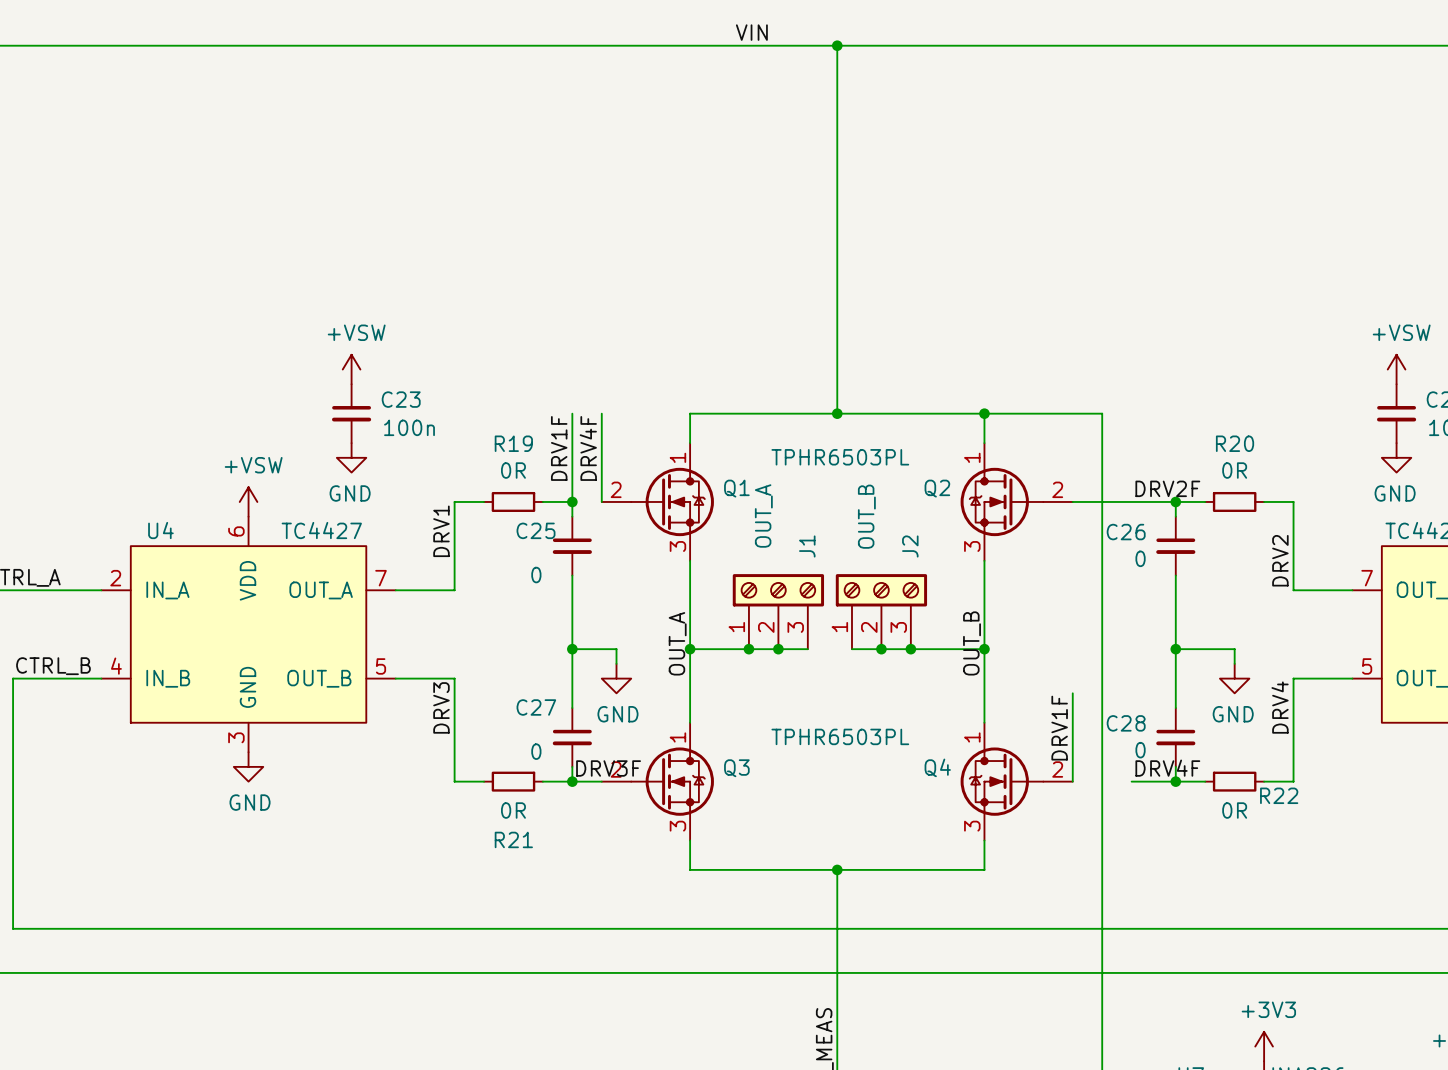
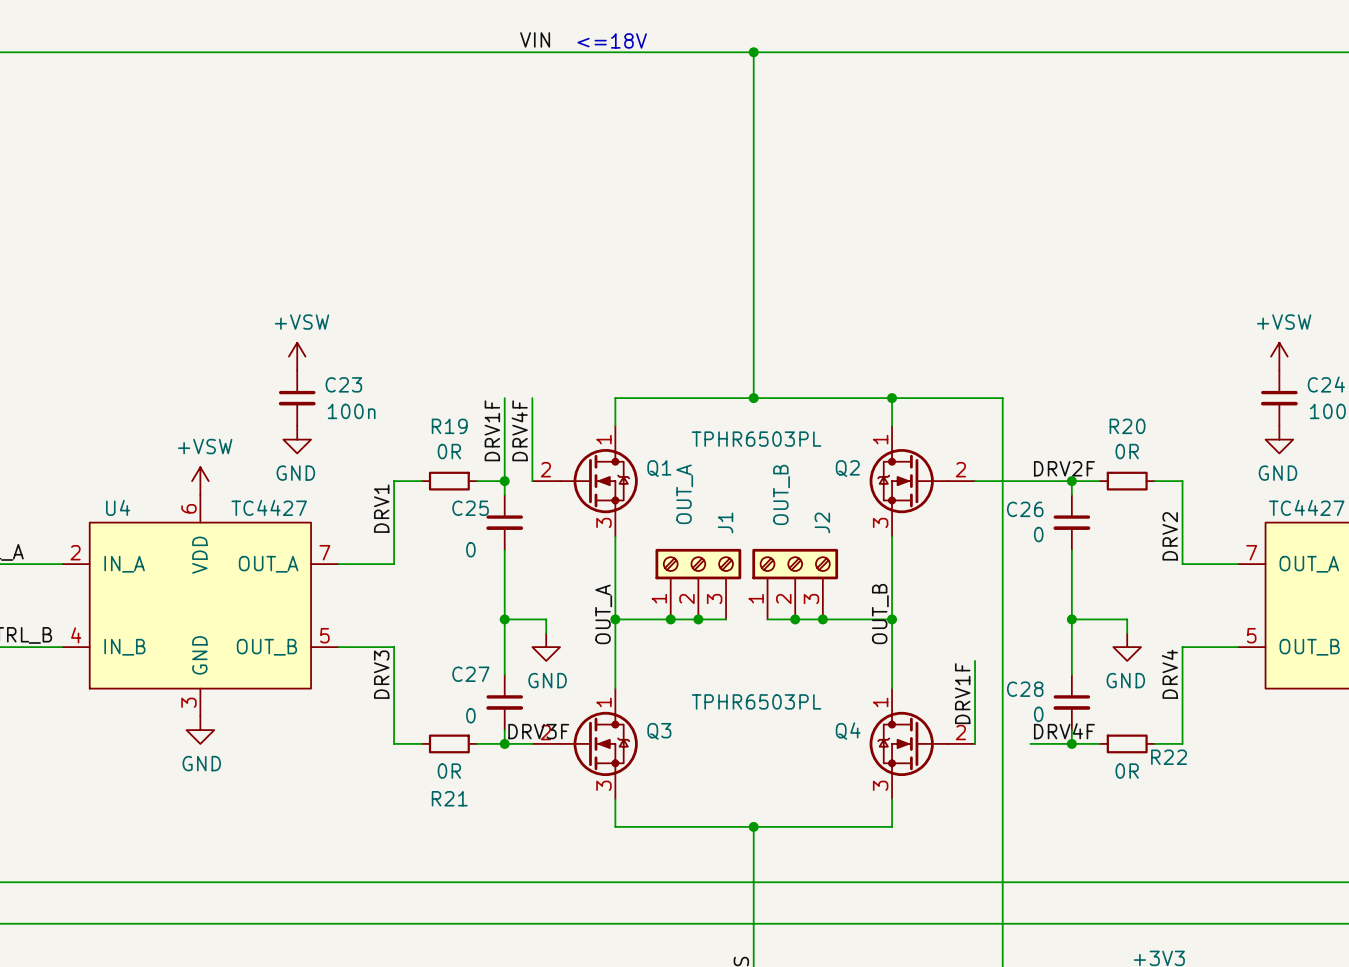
label position: VIN (751, 32) -> VIN (535, 39)
text: none -> <=18V (612, 40)

